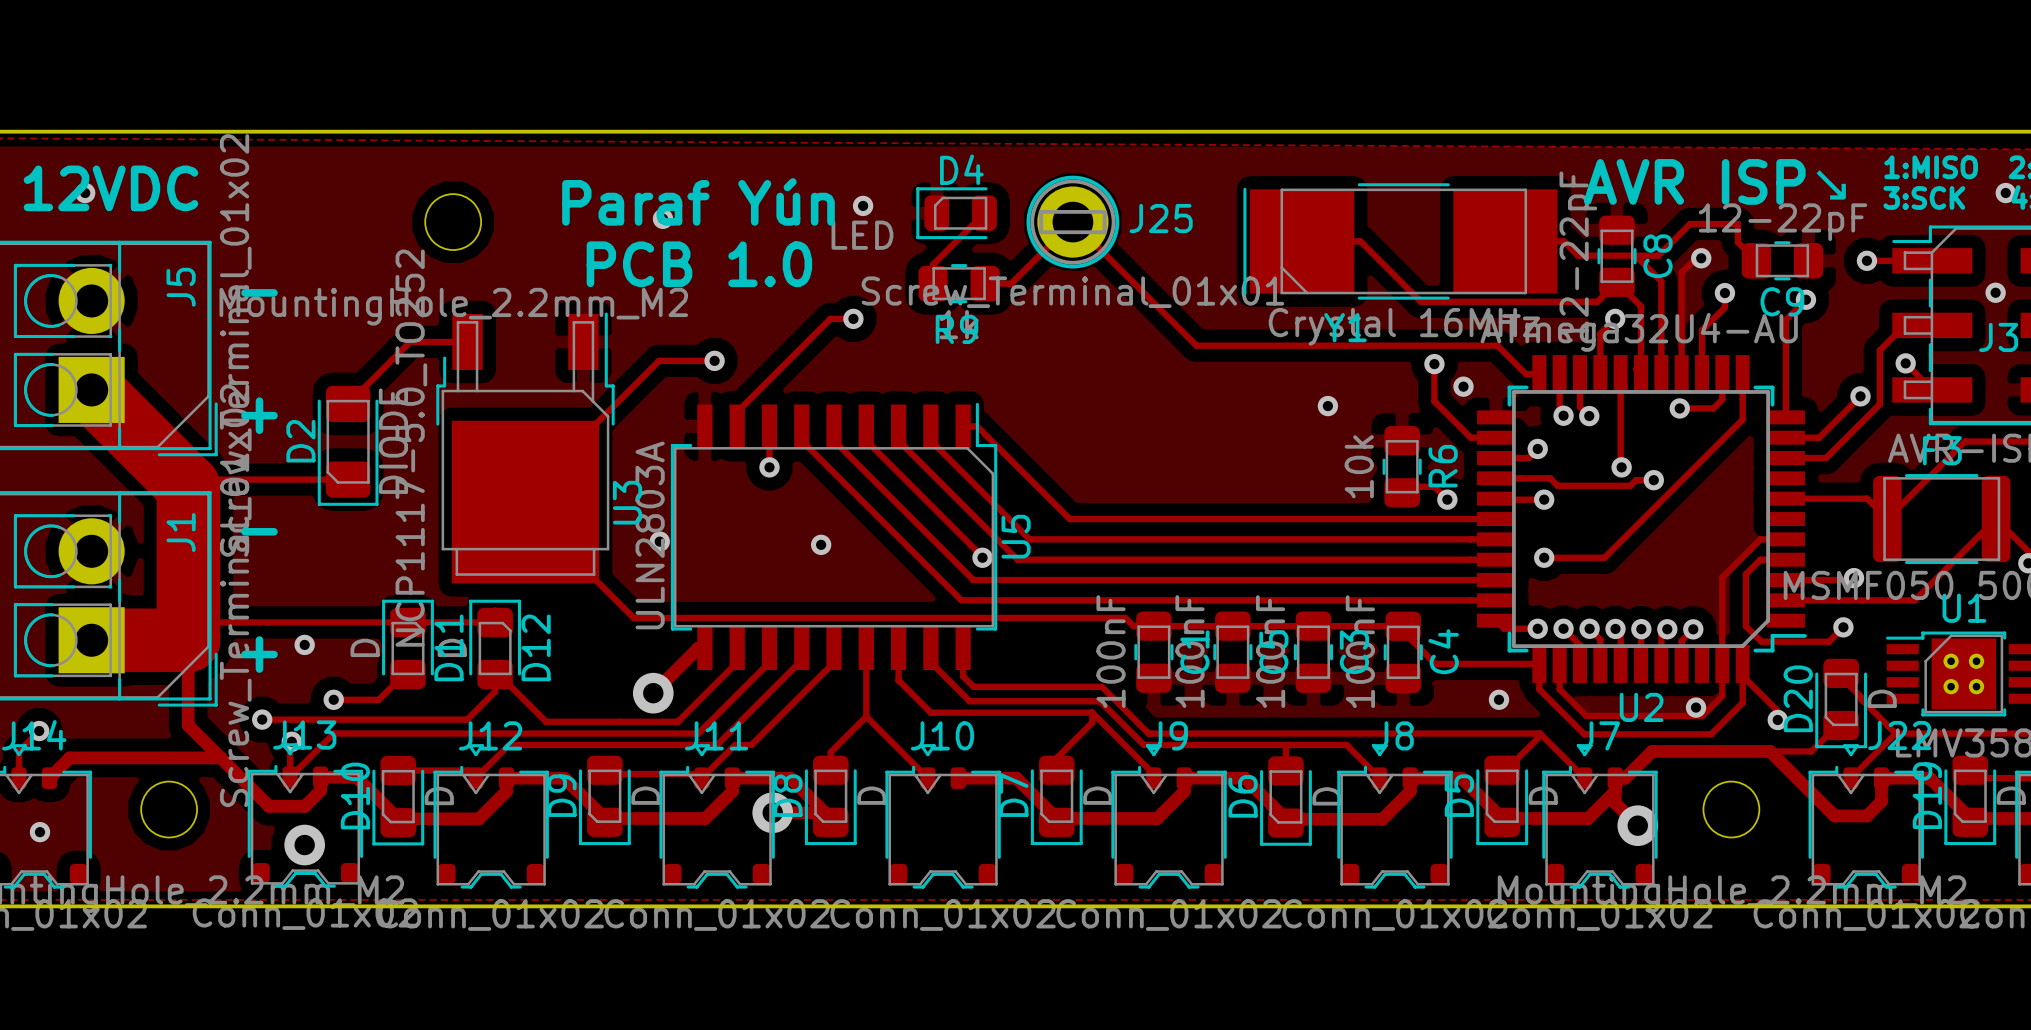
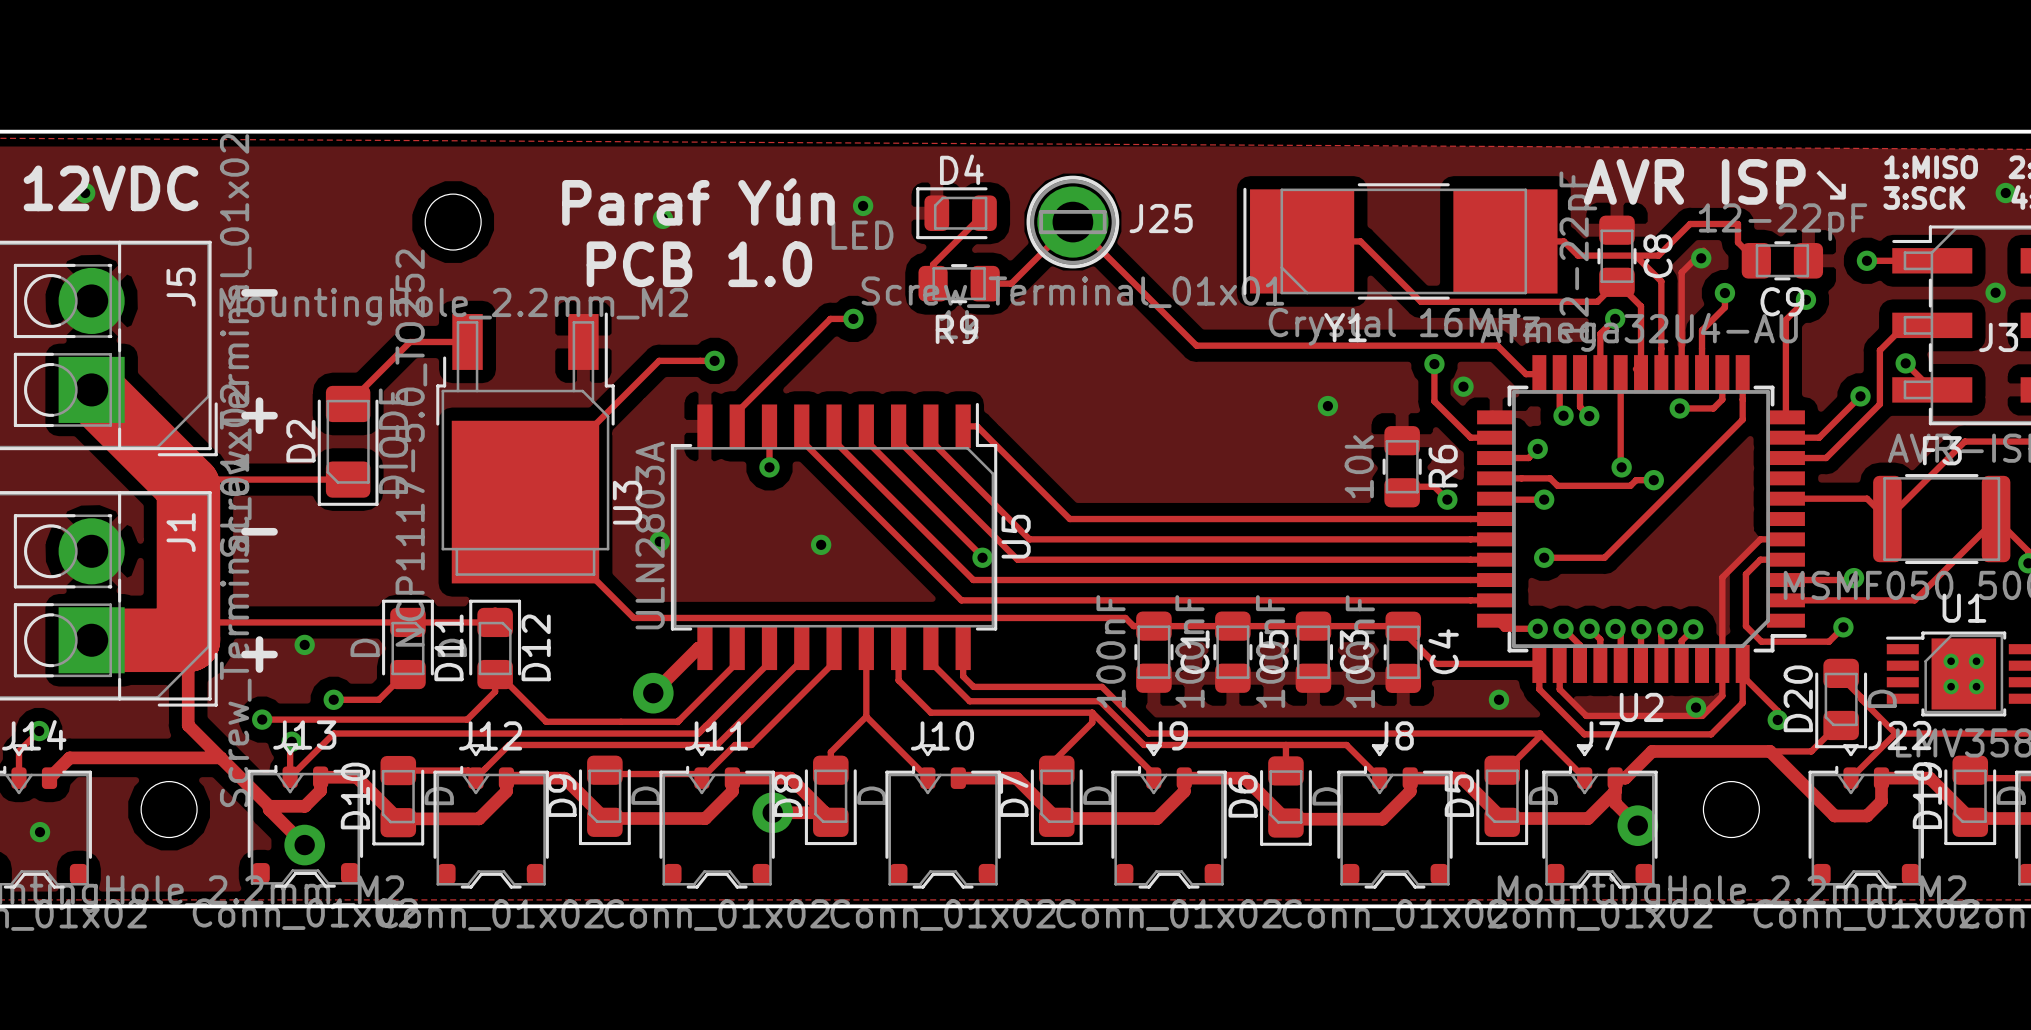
track: none -> (269, 806) (269, 809) (304, 845)

